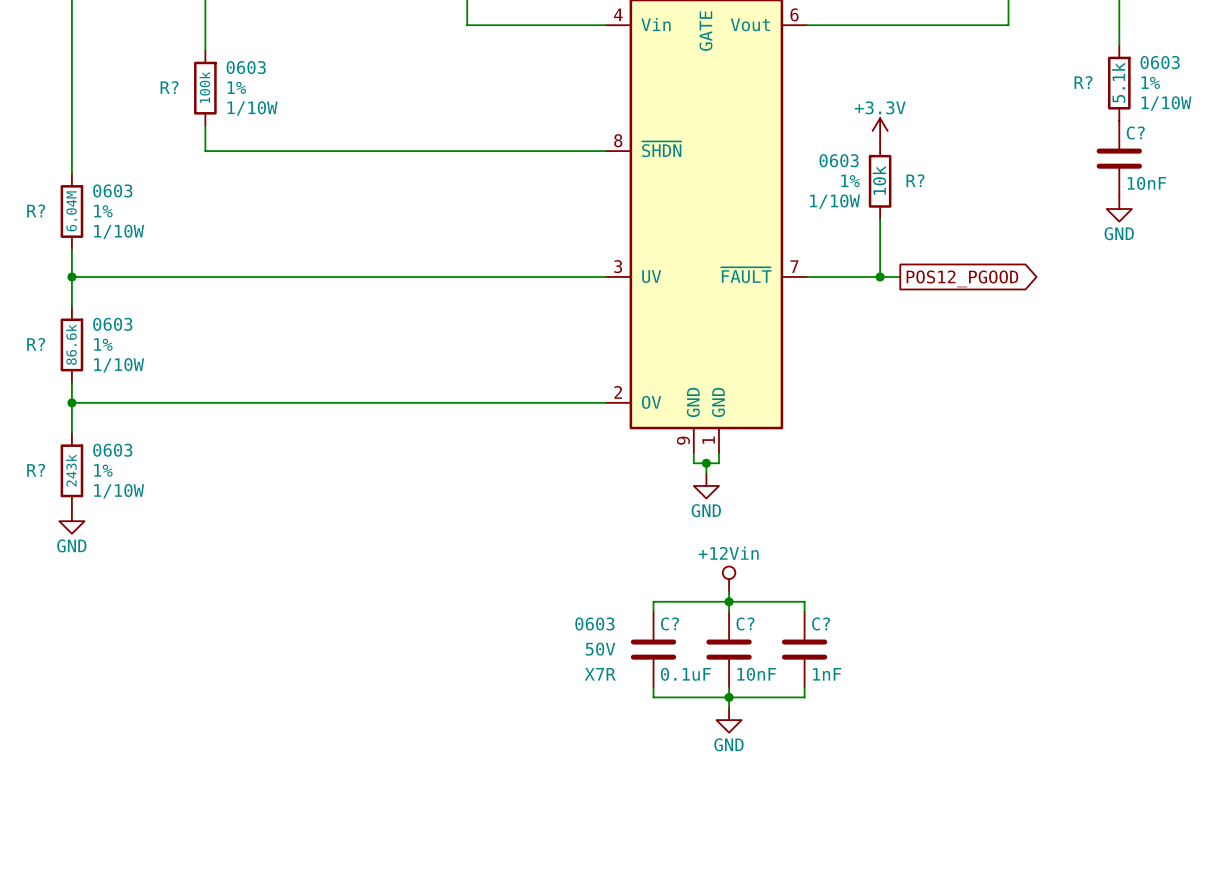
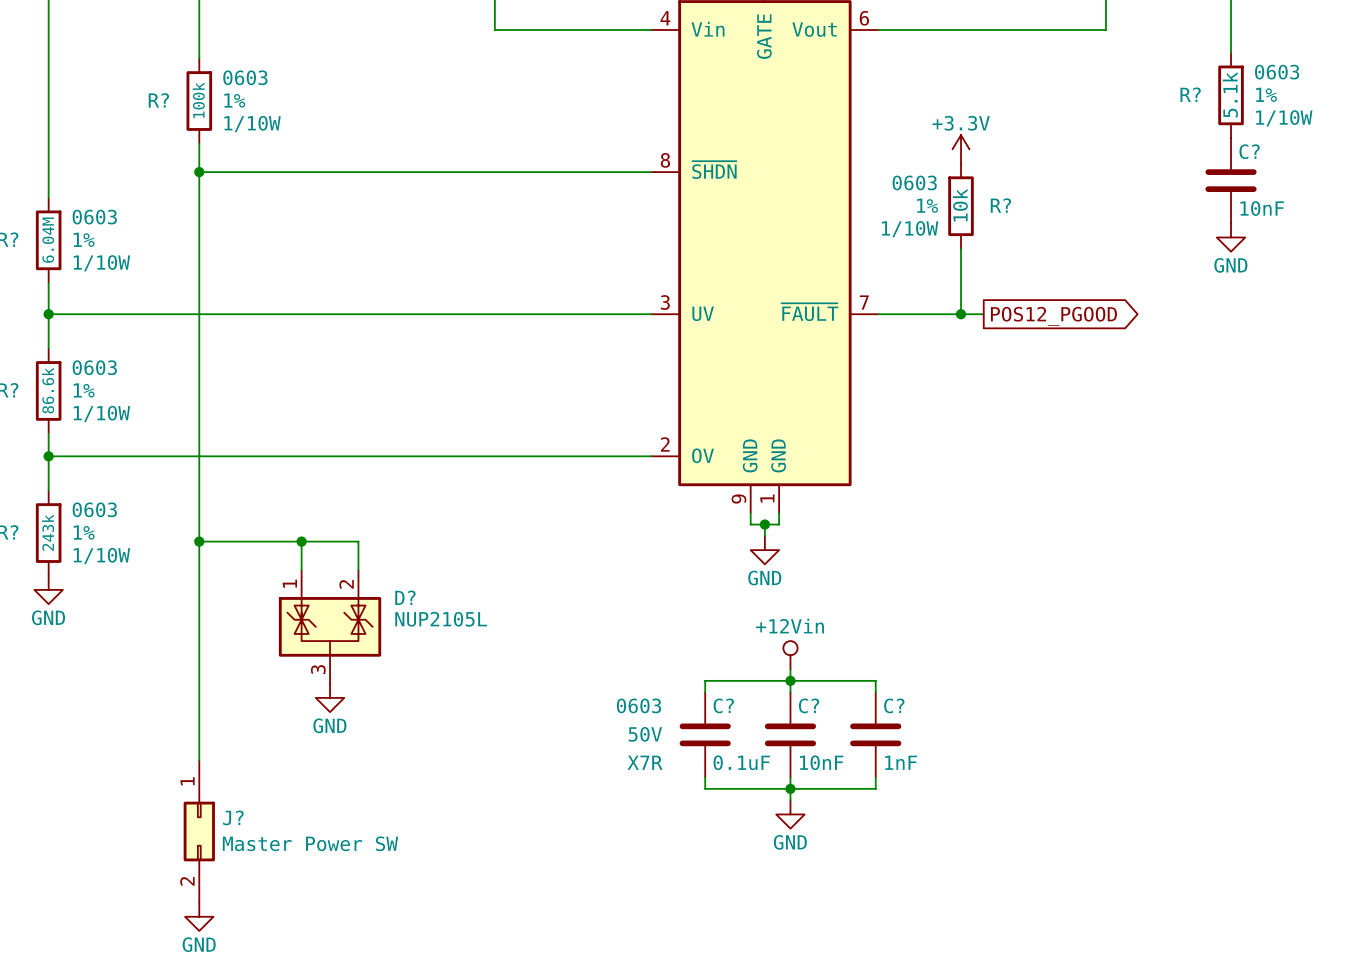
wire: none -> (199, 172) (199, 760)
junction: none -> (199, 172)
wire: none -> (199, 541) (358, 541) (358, 570)
junction: none -> (199, 541)
wire: none -> (301, 541) (301, 570)
junction: none -> (301, 541)
D?: none -> NUP2105L (330, 626)
power symbol: none -> GND (330, 697)
J?: none -> Master Power SW (199, 831)
power symbol: none -> GND (199, 916)

